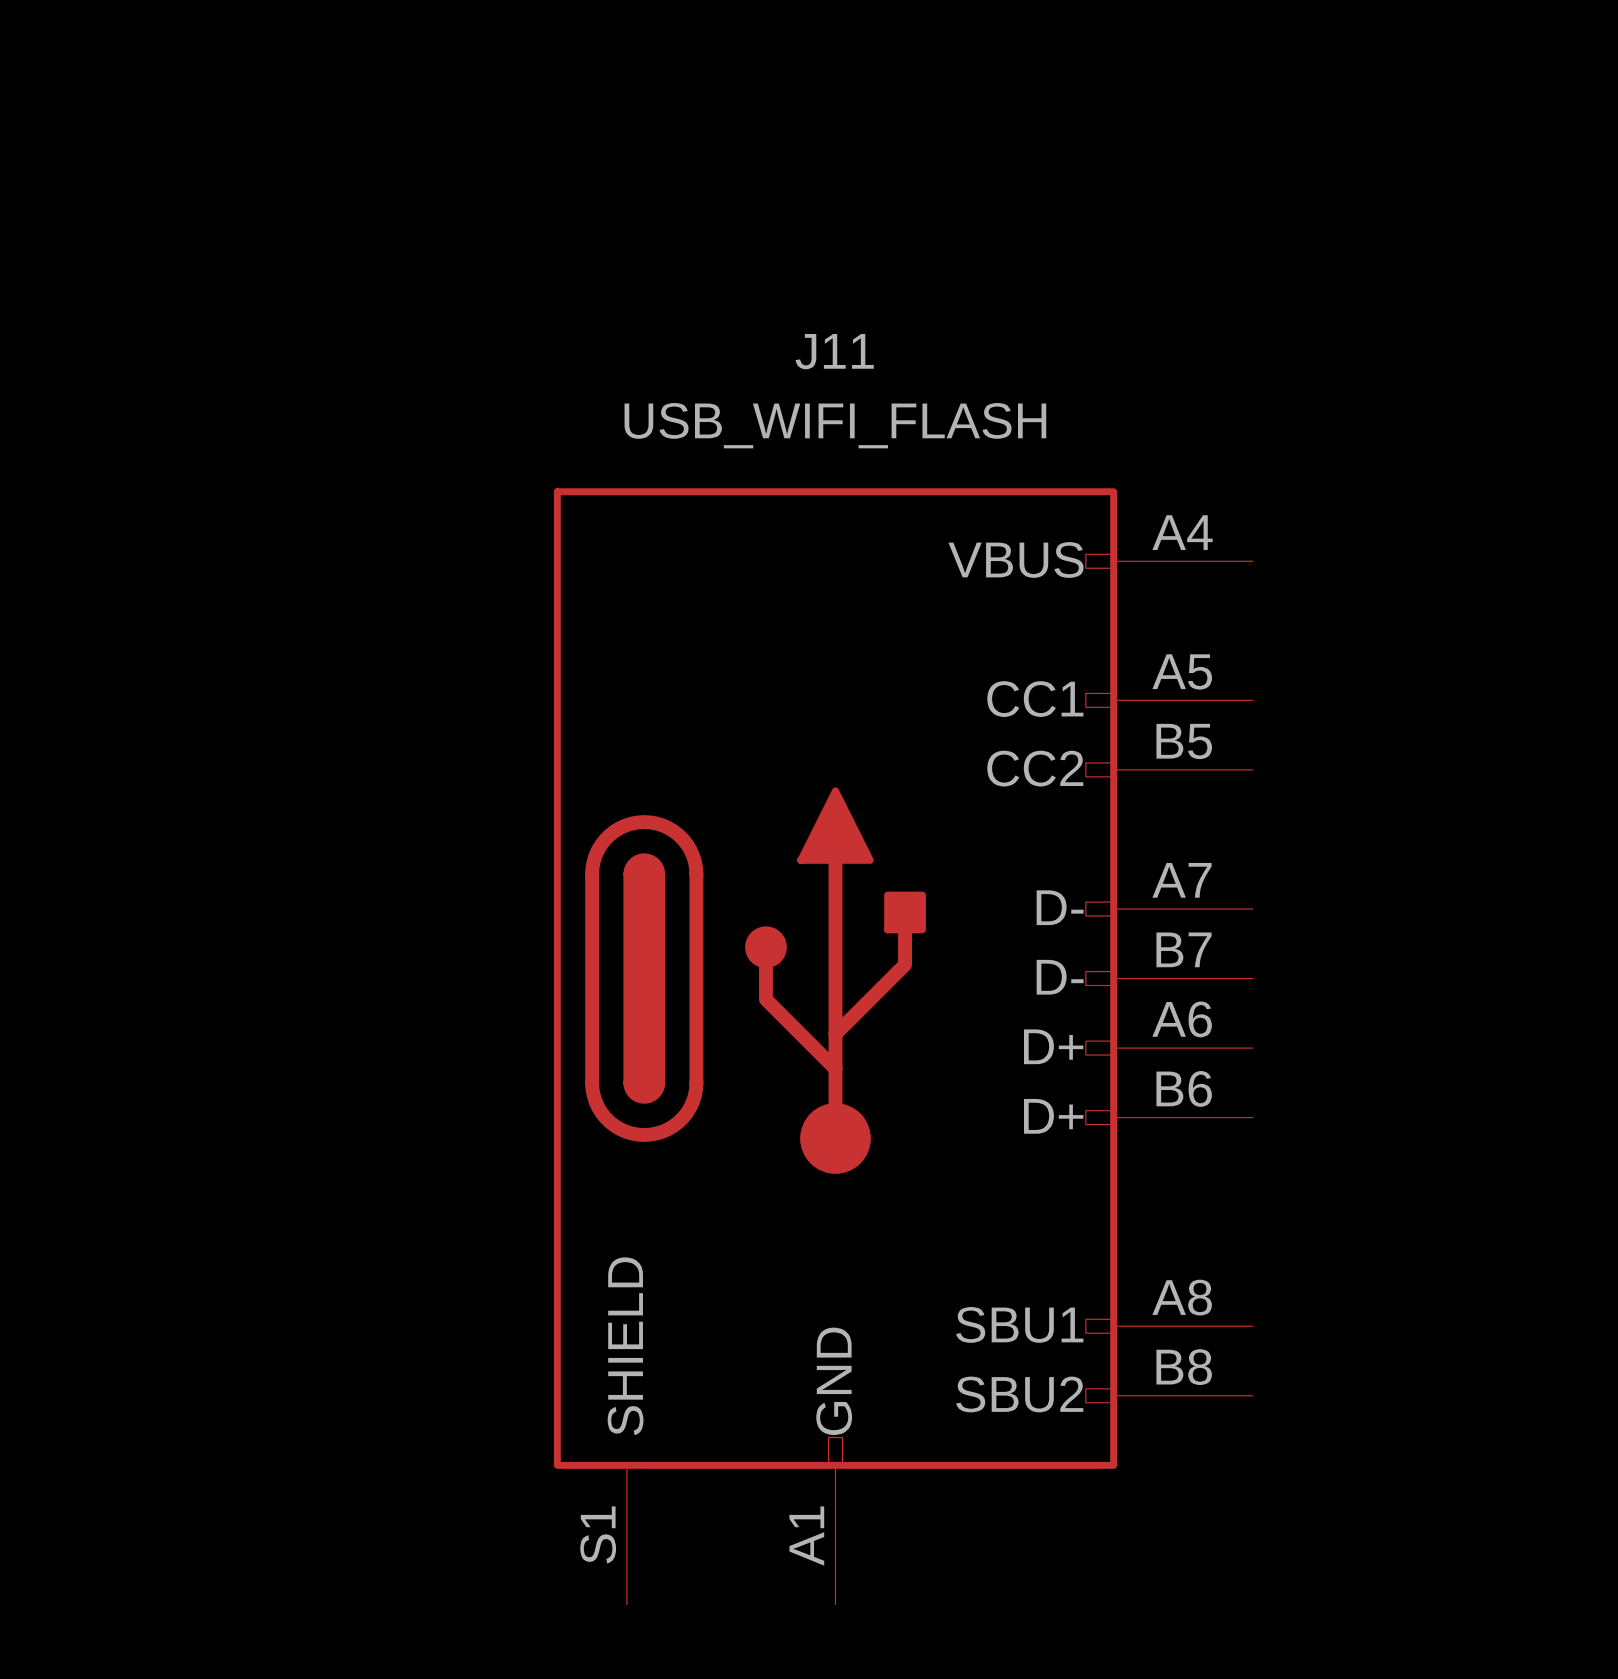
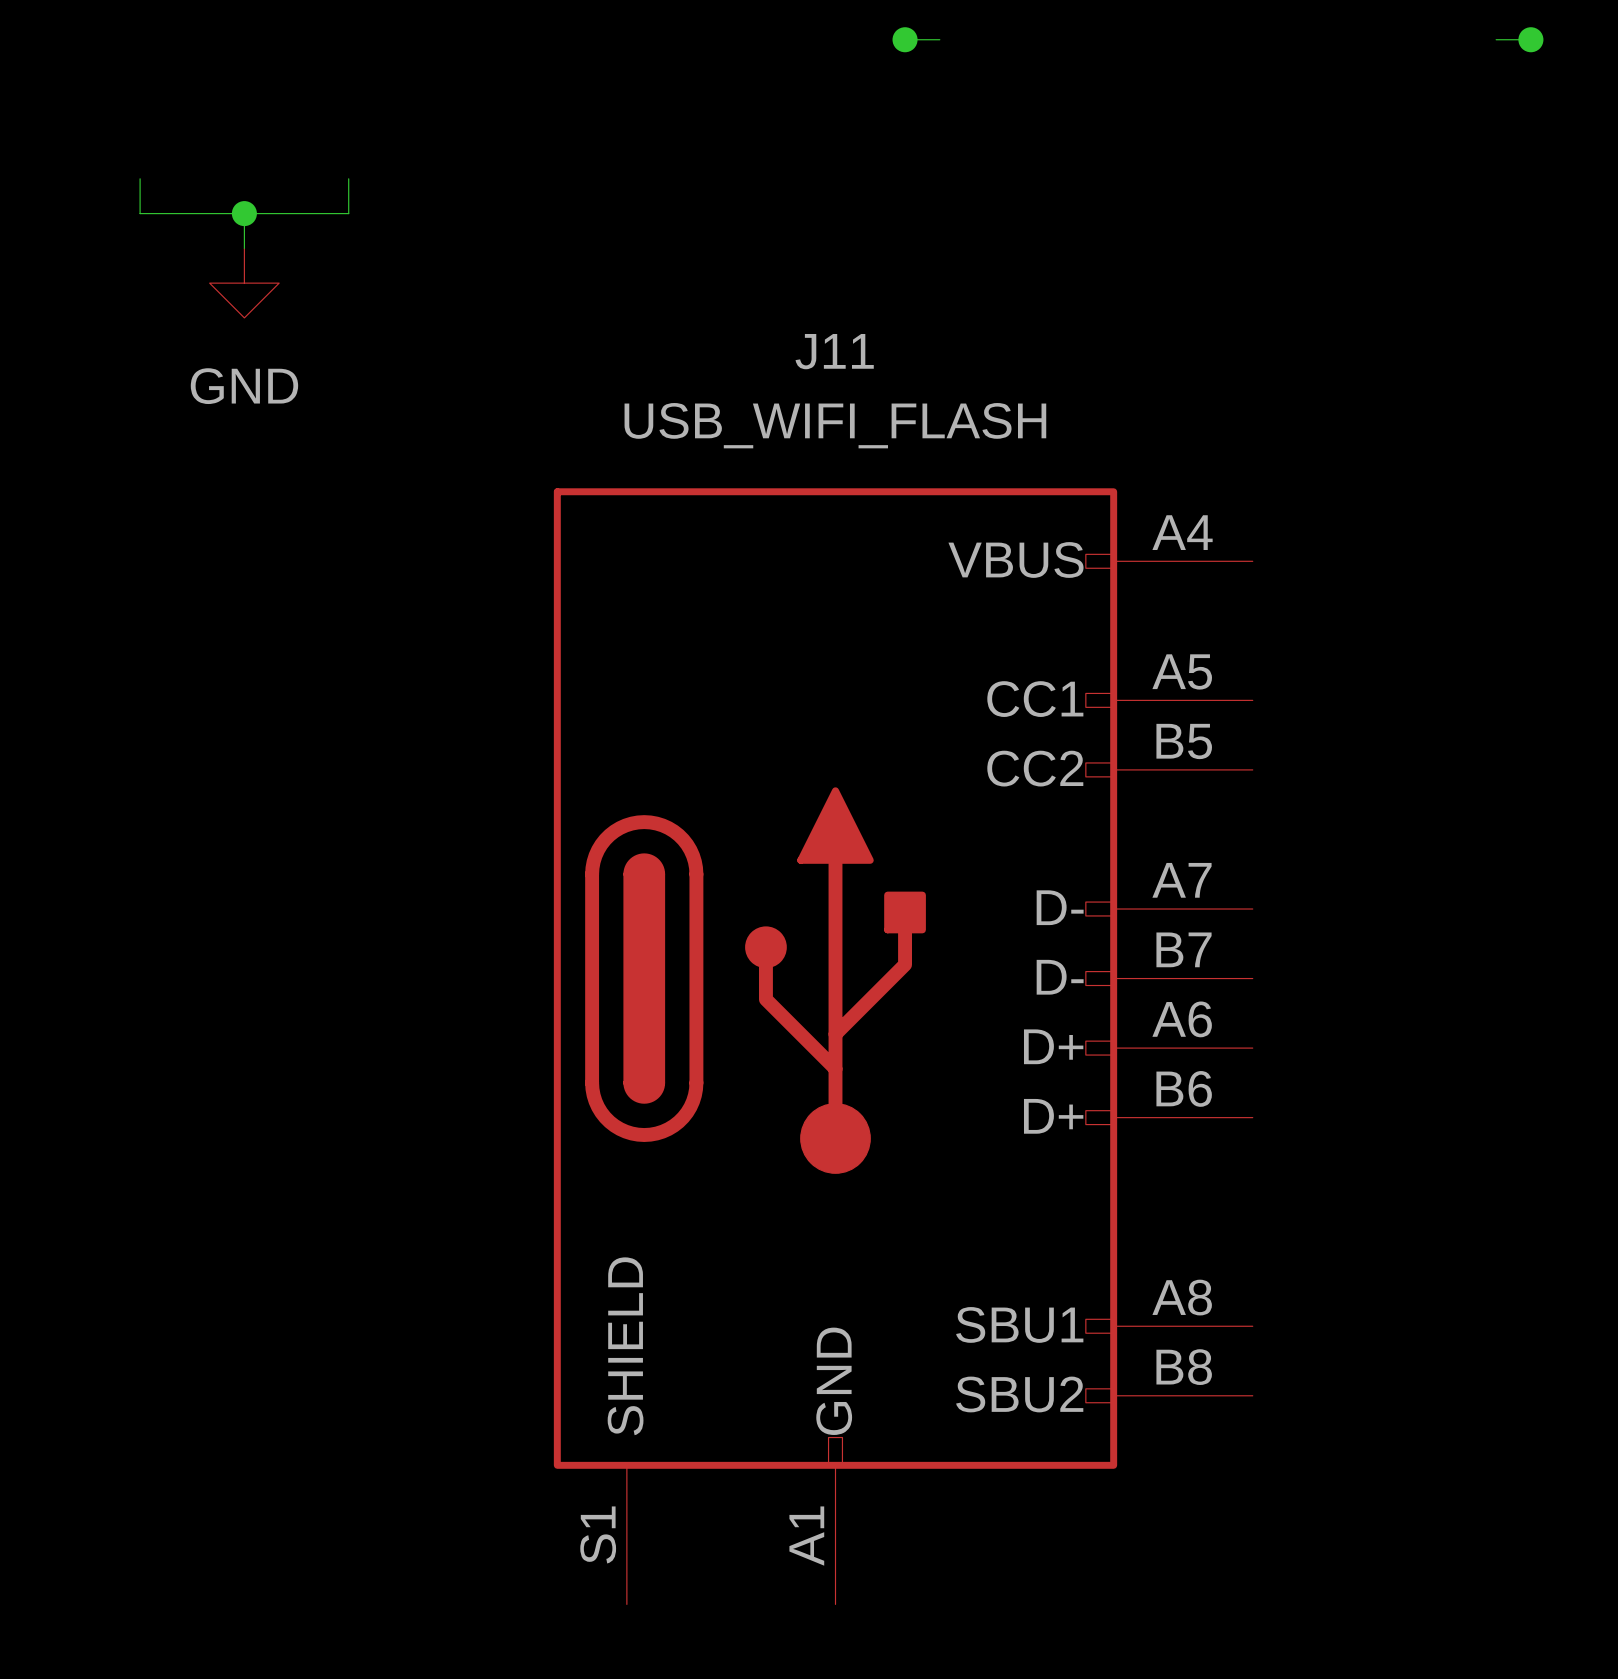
wire: none -> (905, 39) (939, 39)
junction: none -> (905, 39)
wire: none -> (1496, 39) (1530, 39)
junction: none -> (1530, 39)
wire: none -> (140, 178) (140, 213) (348, 213) (348, 178)
wire: none -> (244, 213) (244, 248)
junction: none -> (244, 213)
power symbol: none -> GND (244, 283)

